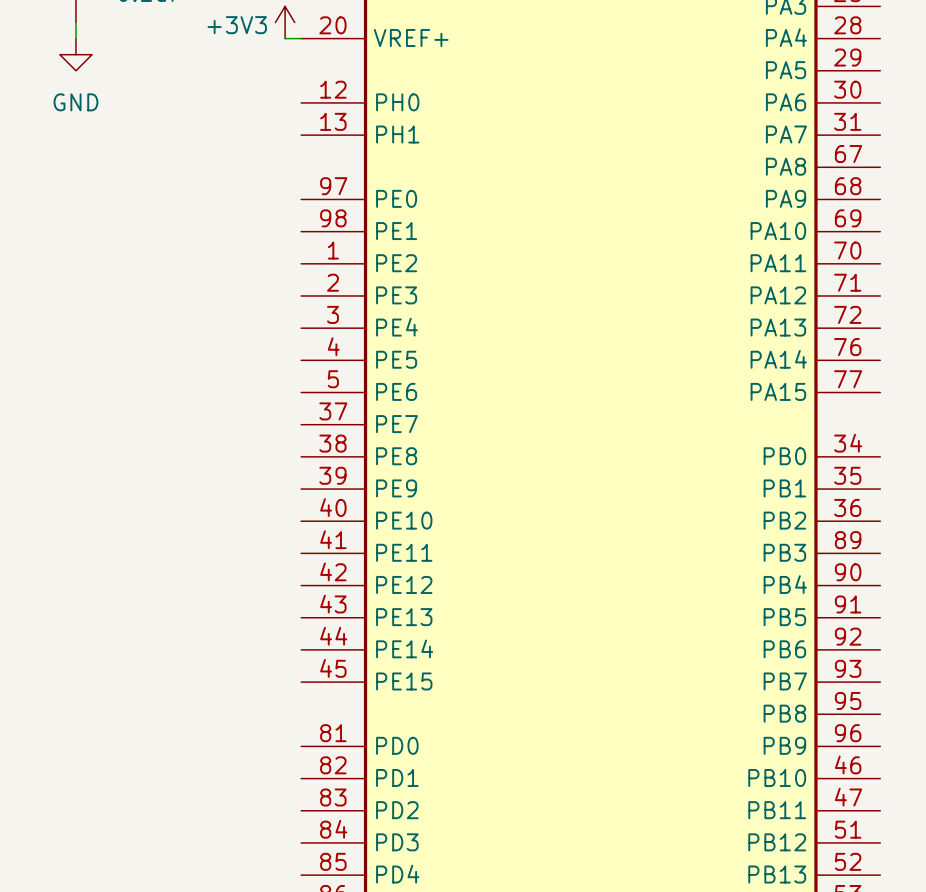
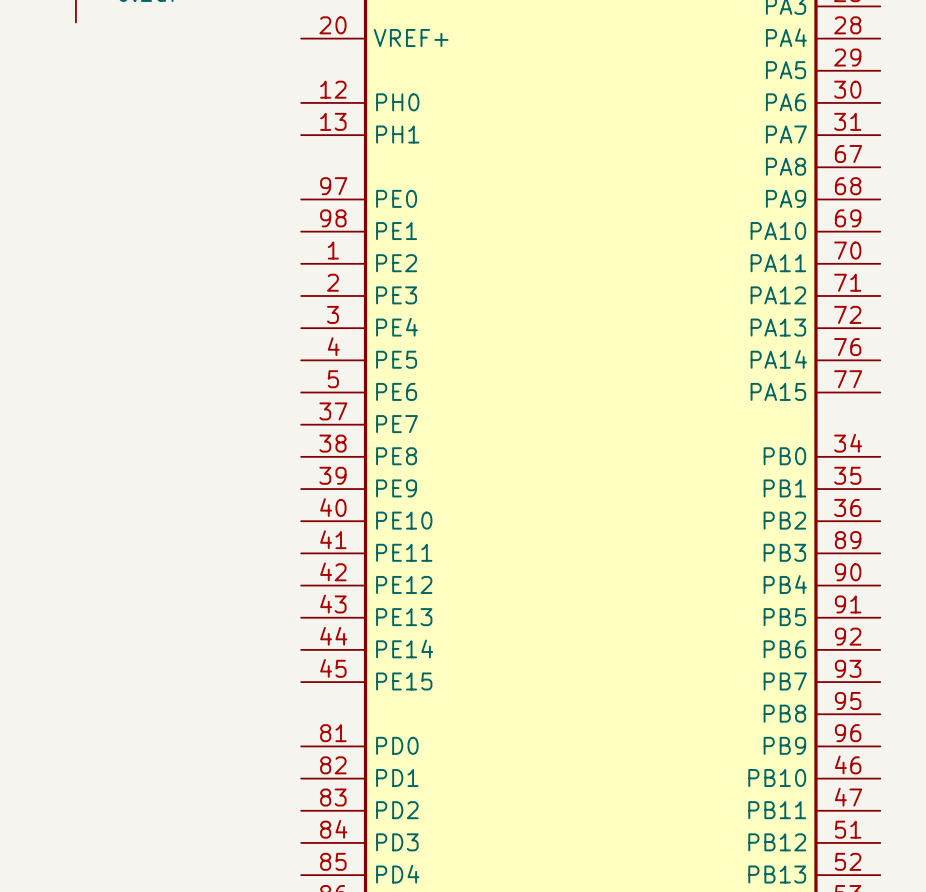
wire: (75, 22) (75, 38) -> none
power symbol: +3V3 (285, 22) -> none
wire: (285, 38) (301, 38) -> none
power symbol: GND (75, 54) -> none

